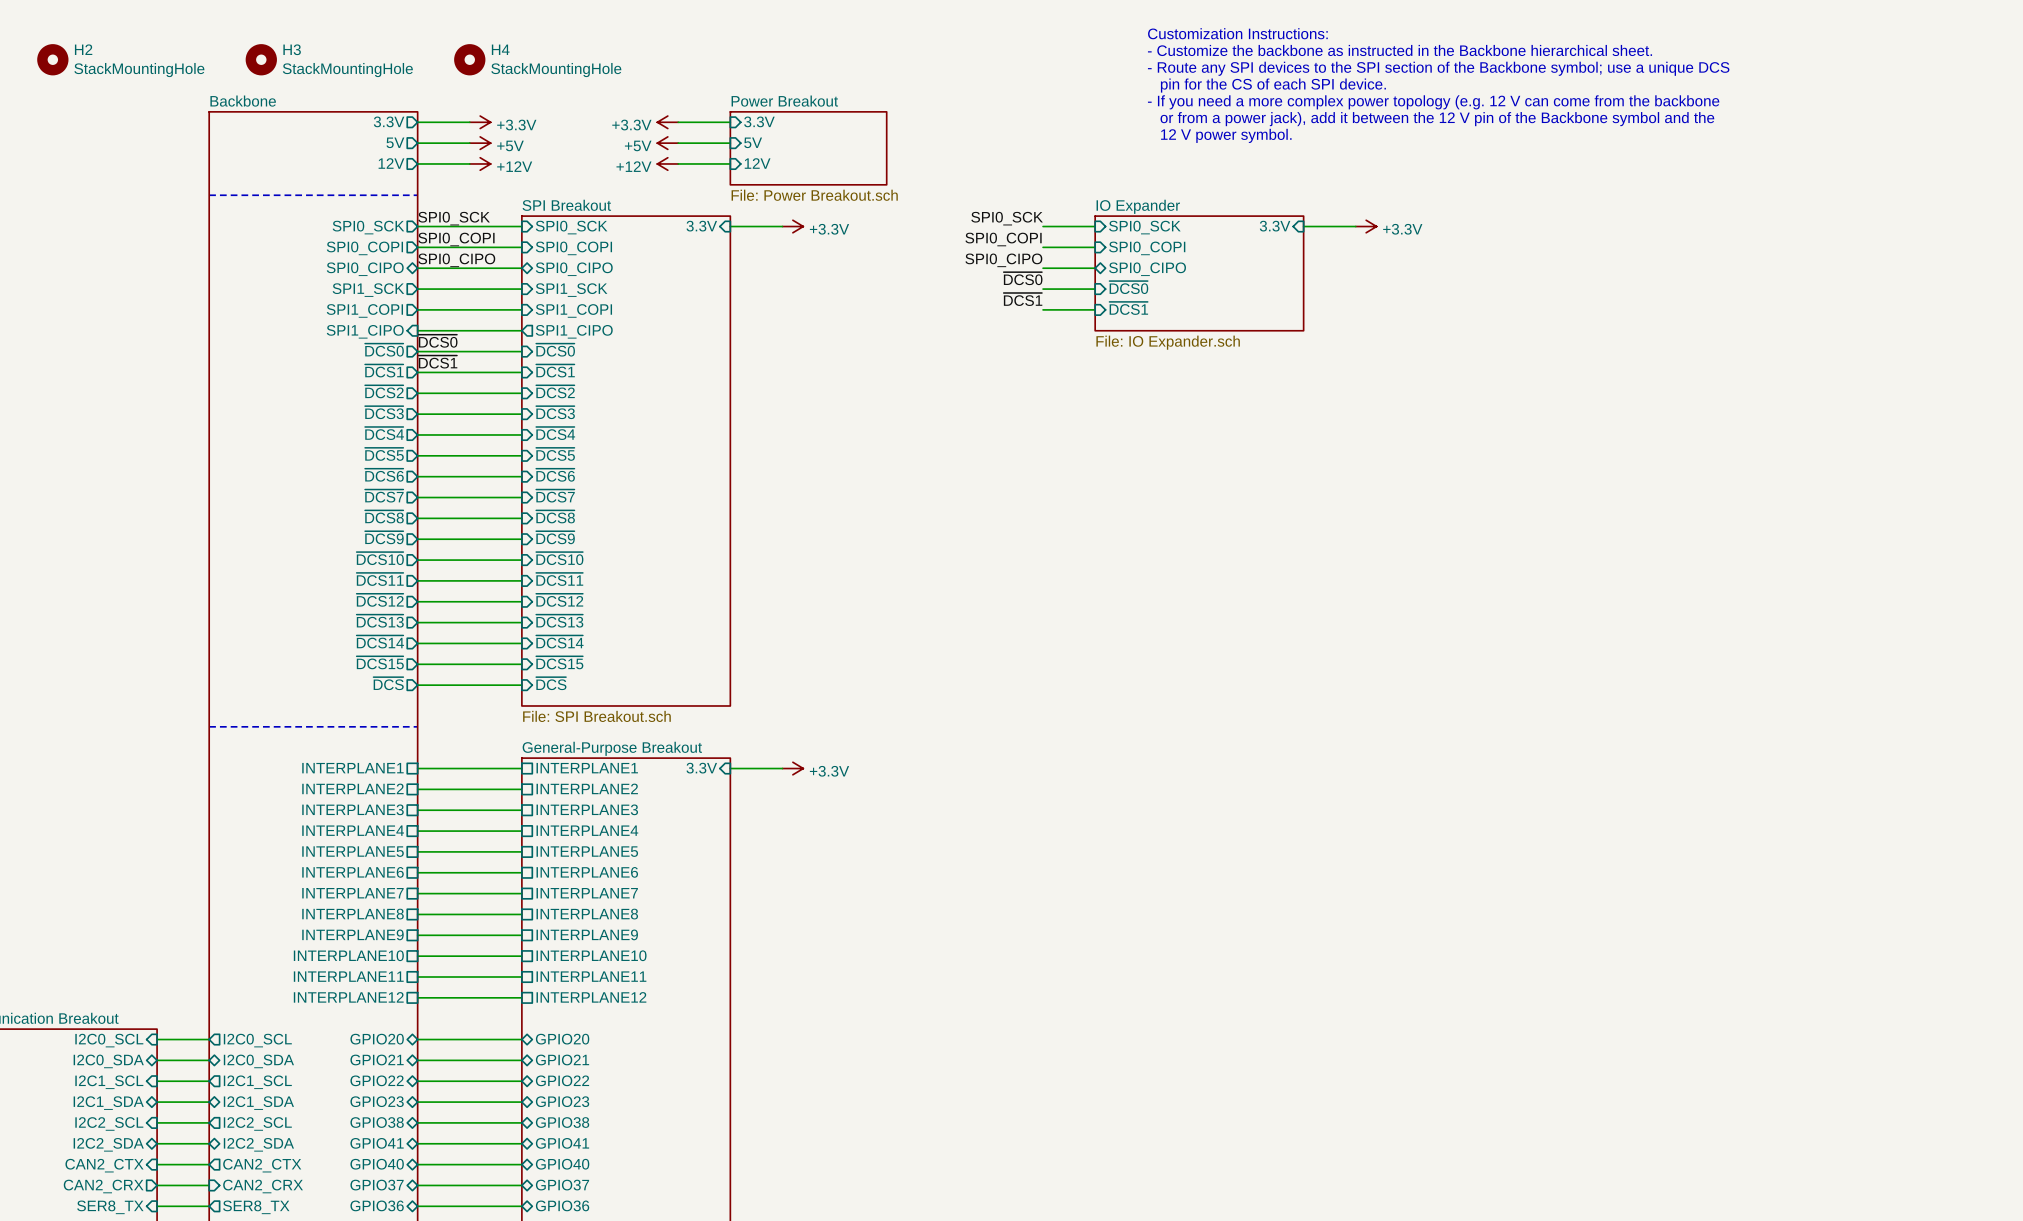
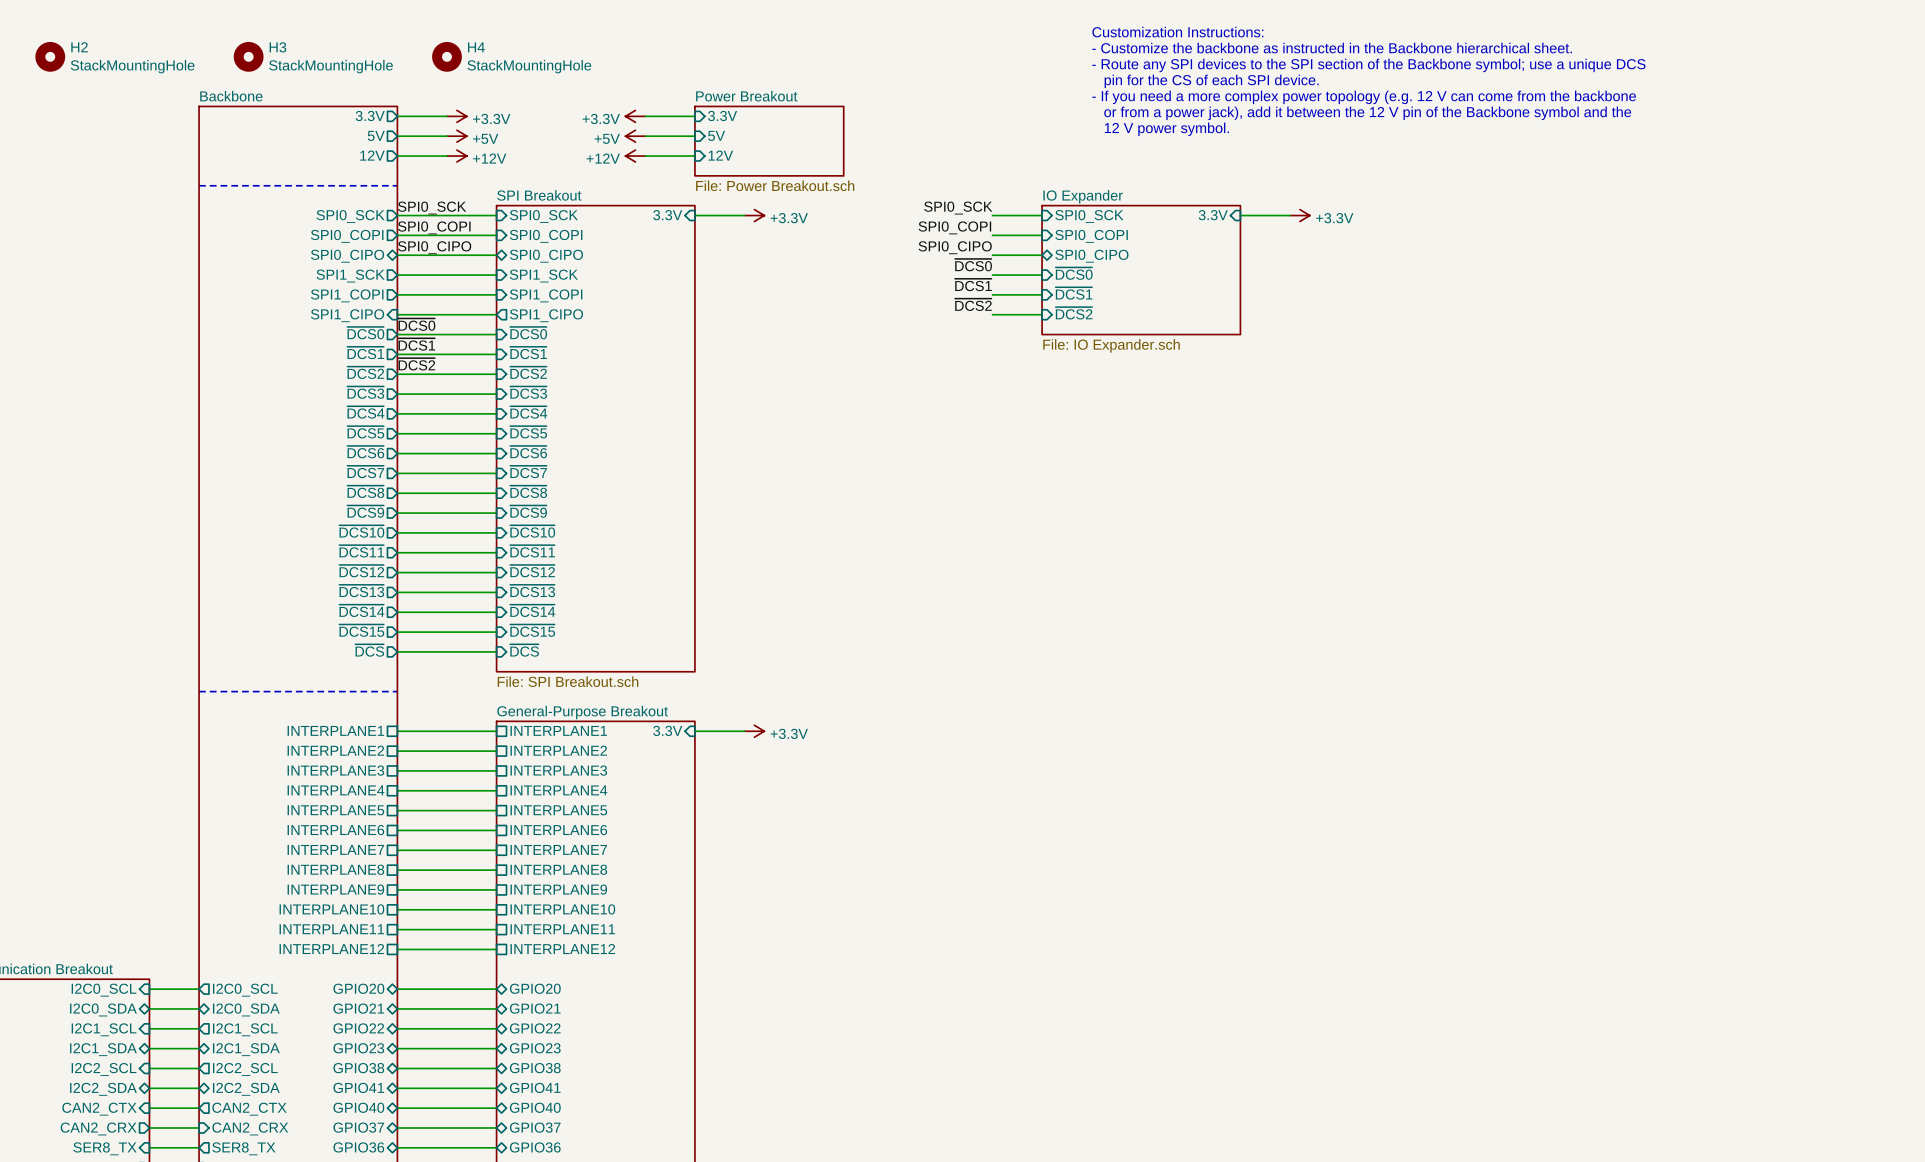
sheet IO Expander: File: IO Expander.sch (1199, 273) -> none
sheet IO Expander: none -> File: IO Expander.sch (1141, 270)
label: none -> ~{DCS2} (973, 304)
sheet pin: none -> ~{DCS2} (1074, 313)
wire: none -> (992, 314) (1042, 314)
label: none -> ~{DCS2} (416, 364)

